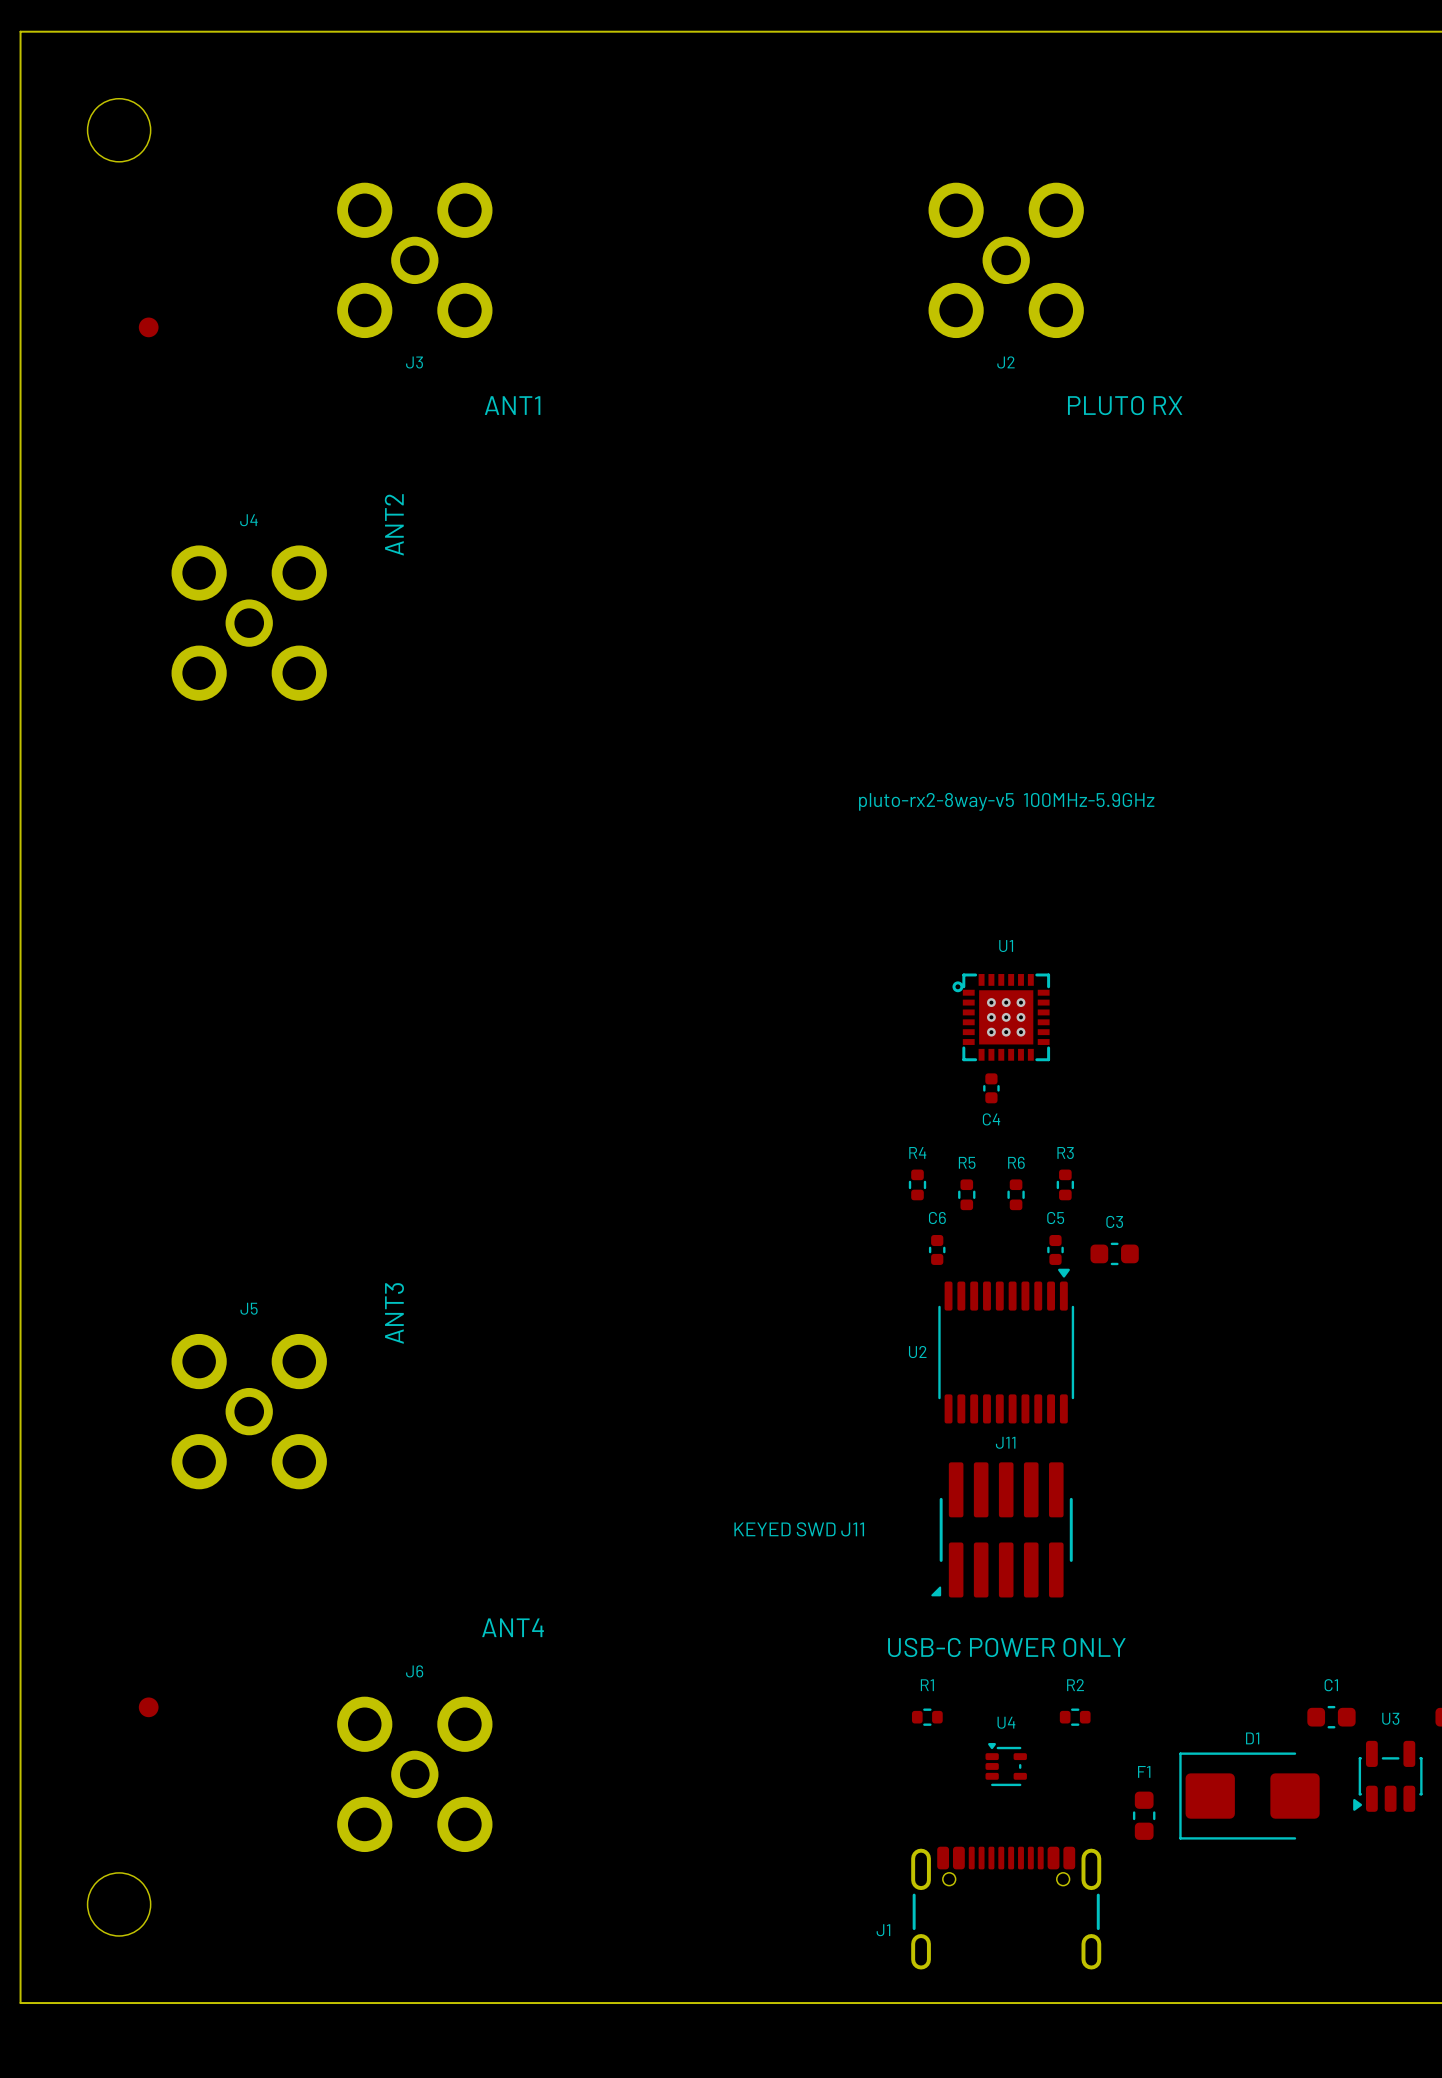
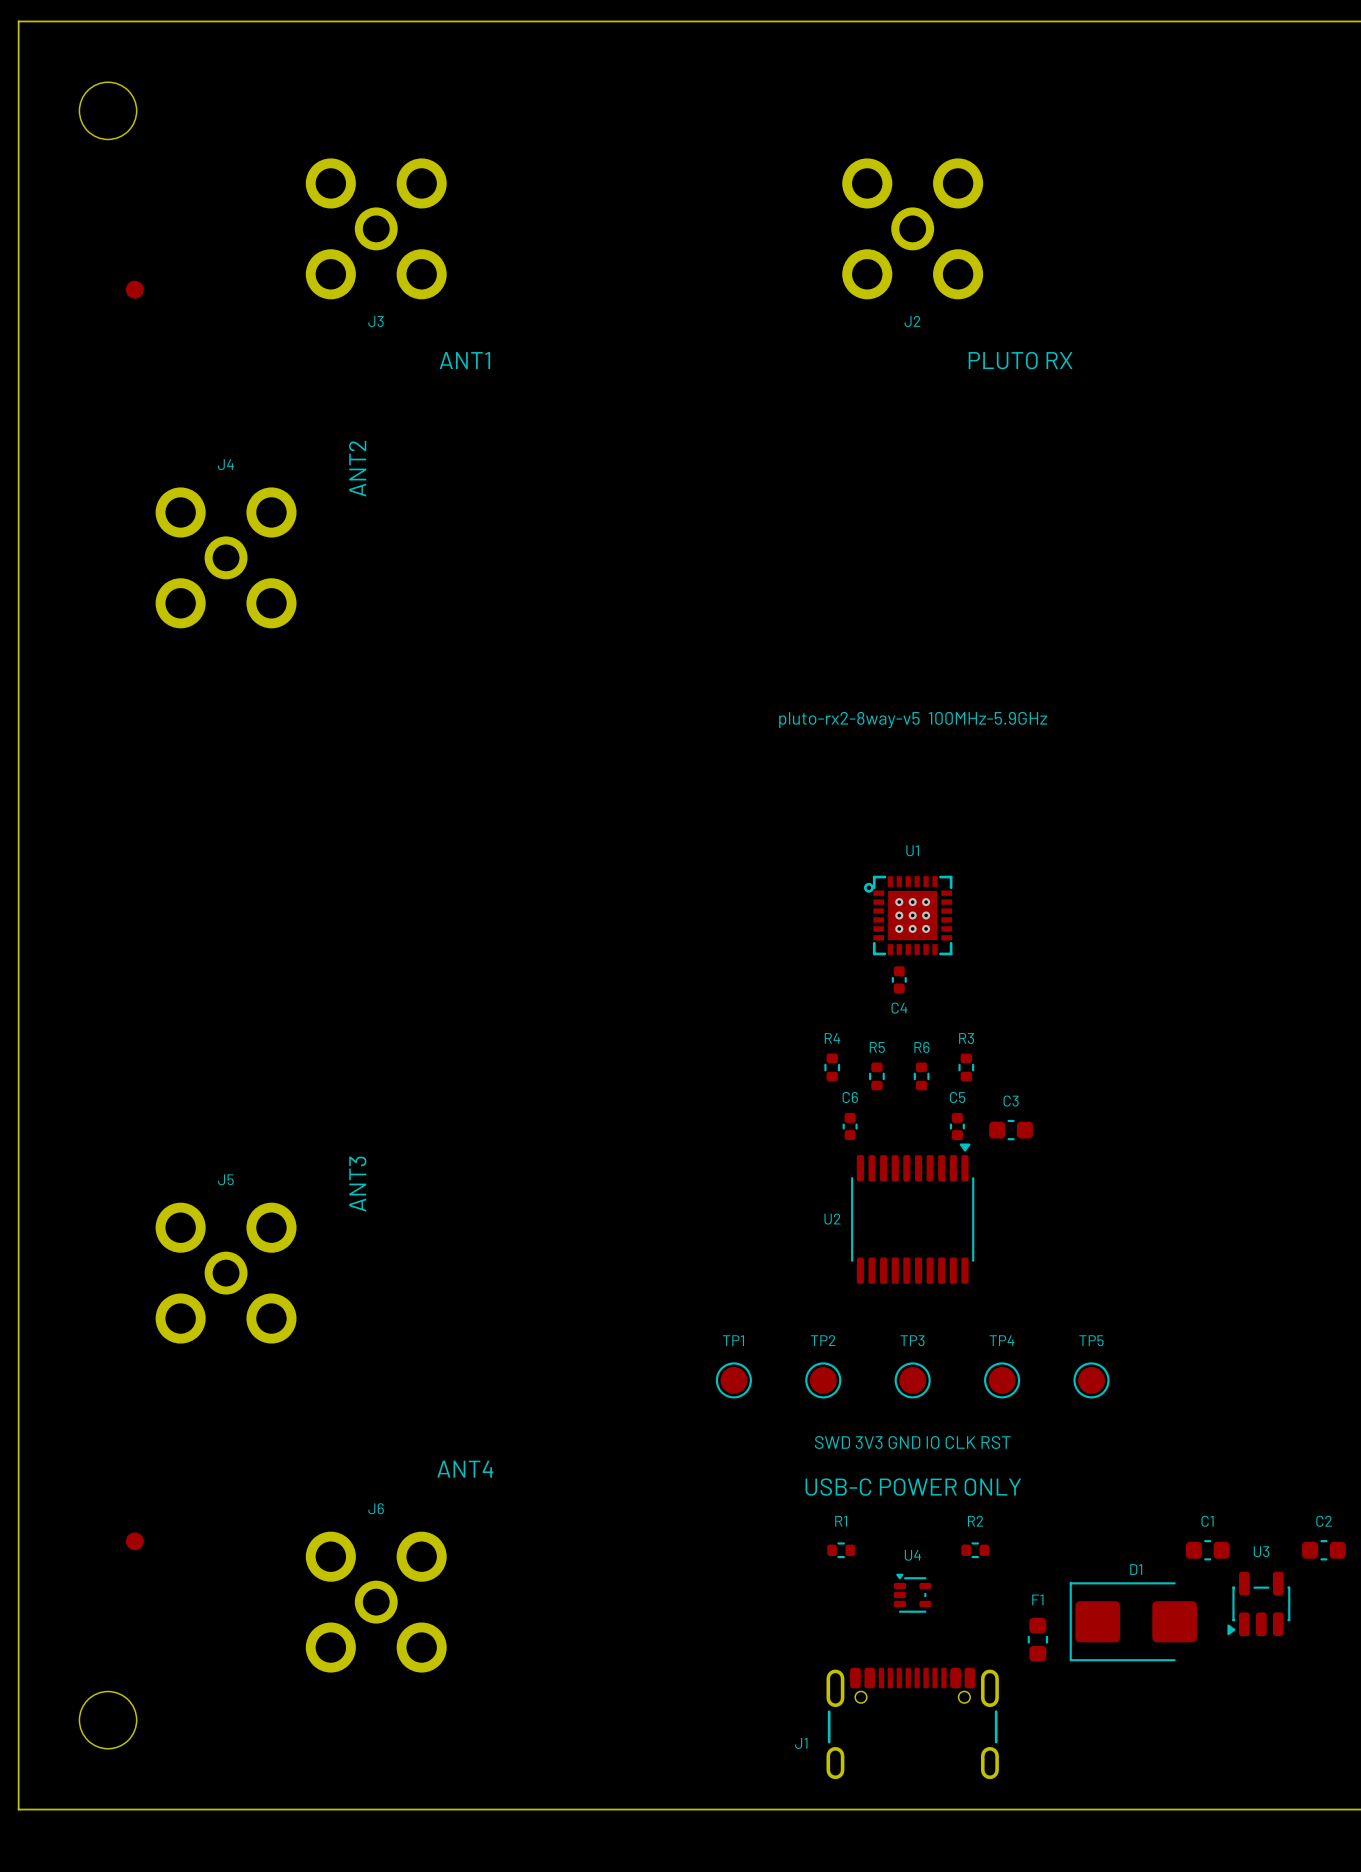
text: KEYED SWD J11 (799, 1529) -> none
TP1: none -> (733, 1380)
TP2: none -> (823, 1380)
J11: (1002, 1529) -> none
TP3: none -> (912, 1380)
TP4: none -> (1002, 1380)
TP5: none -> (1091, 1380)
text: none -> SWD 3V3 GND IO CLK RST (912, 1442)

